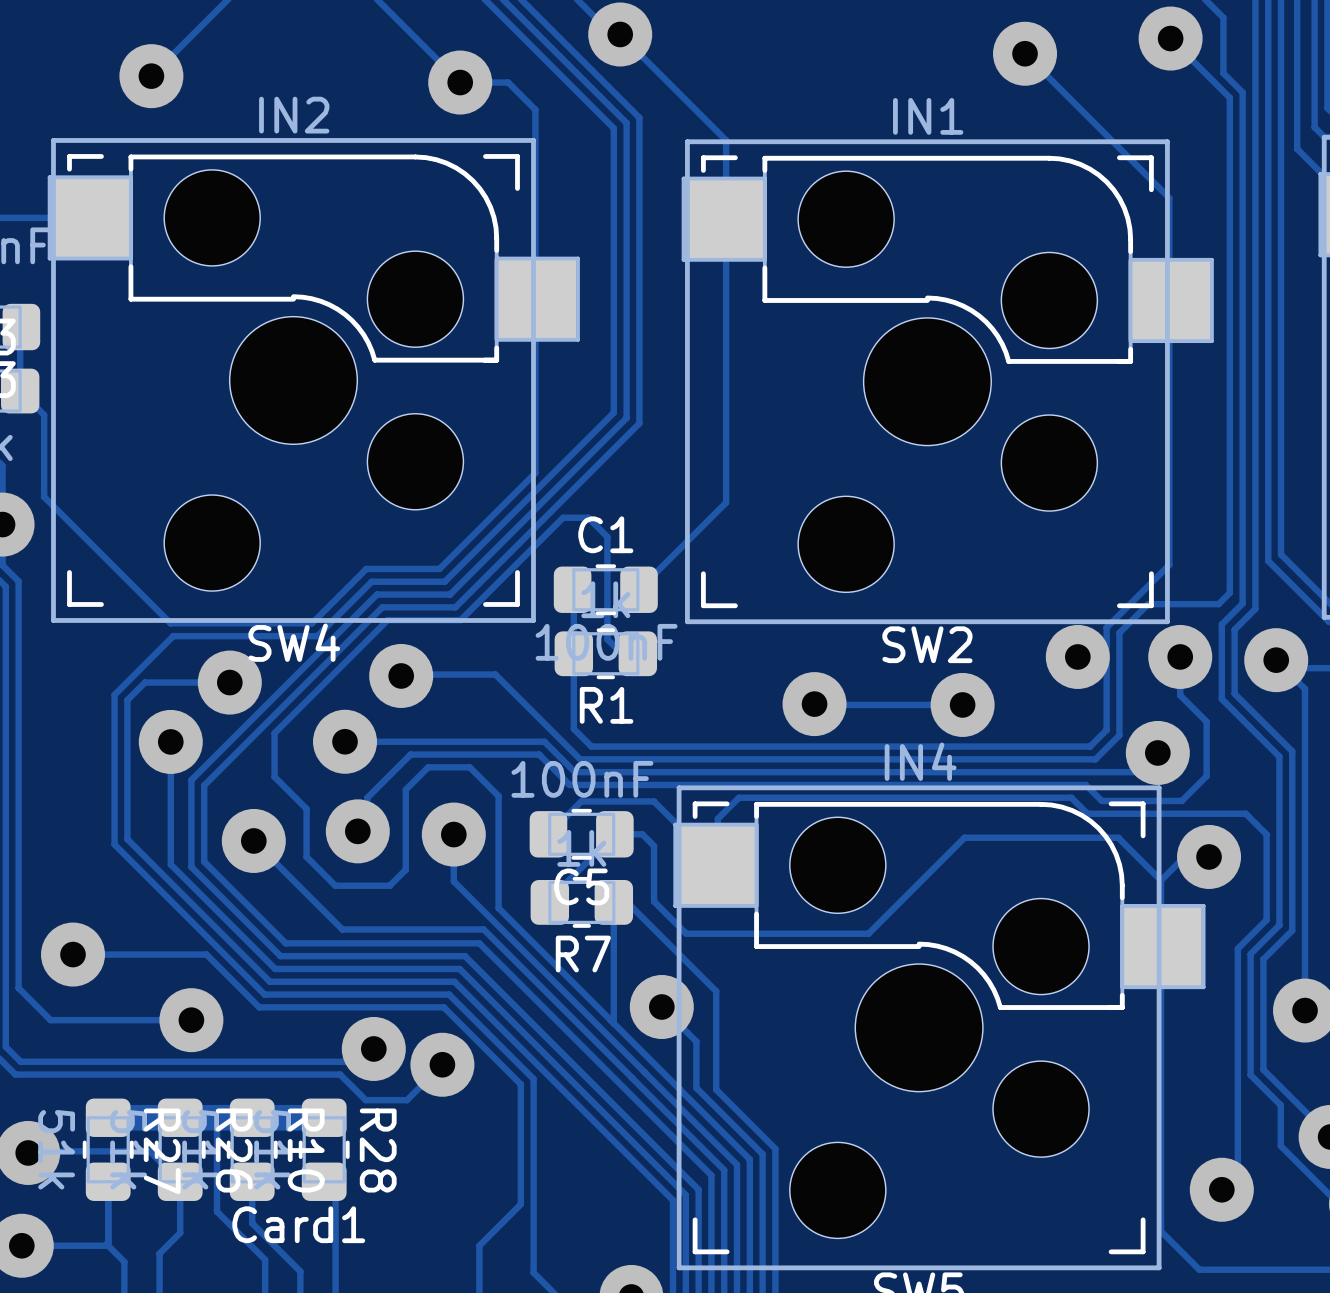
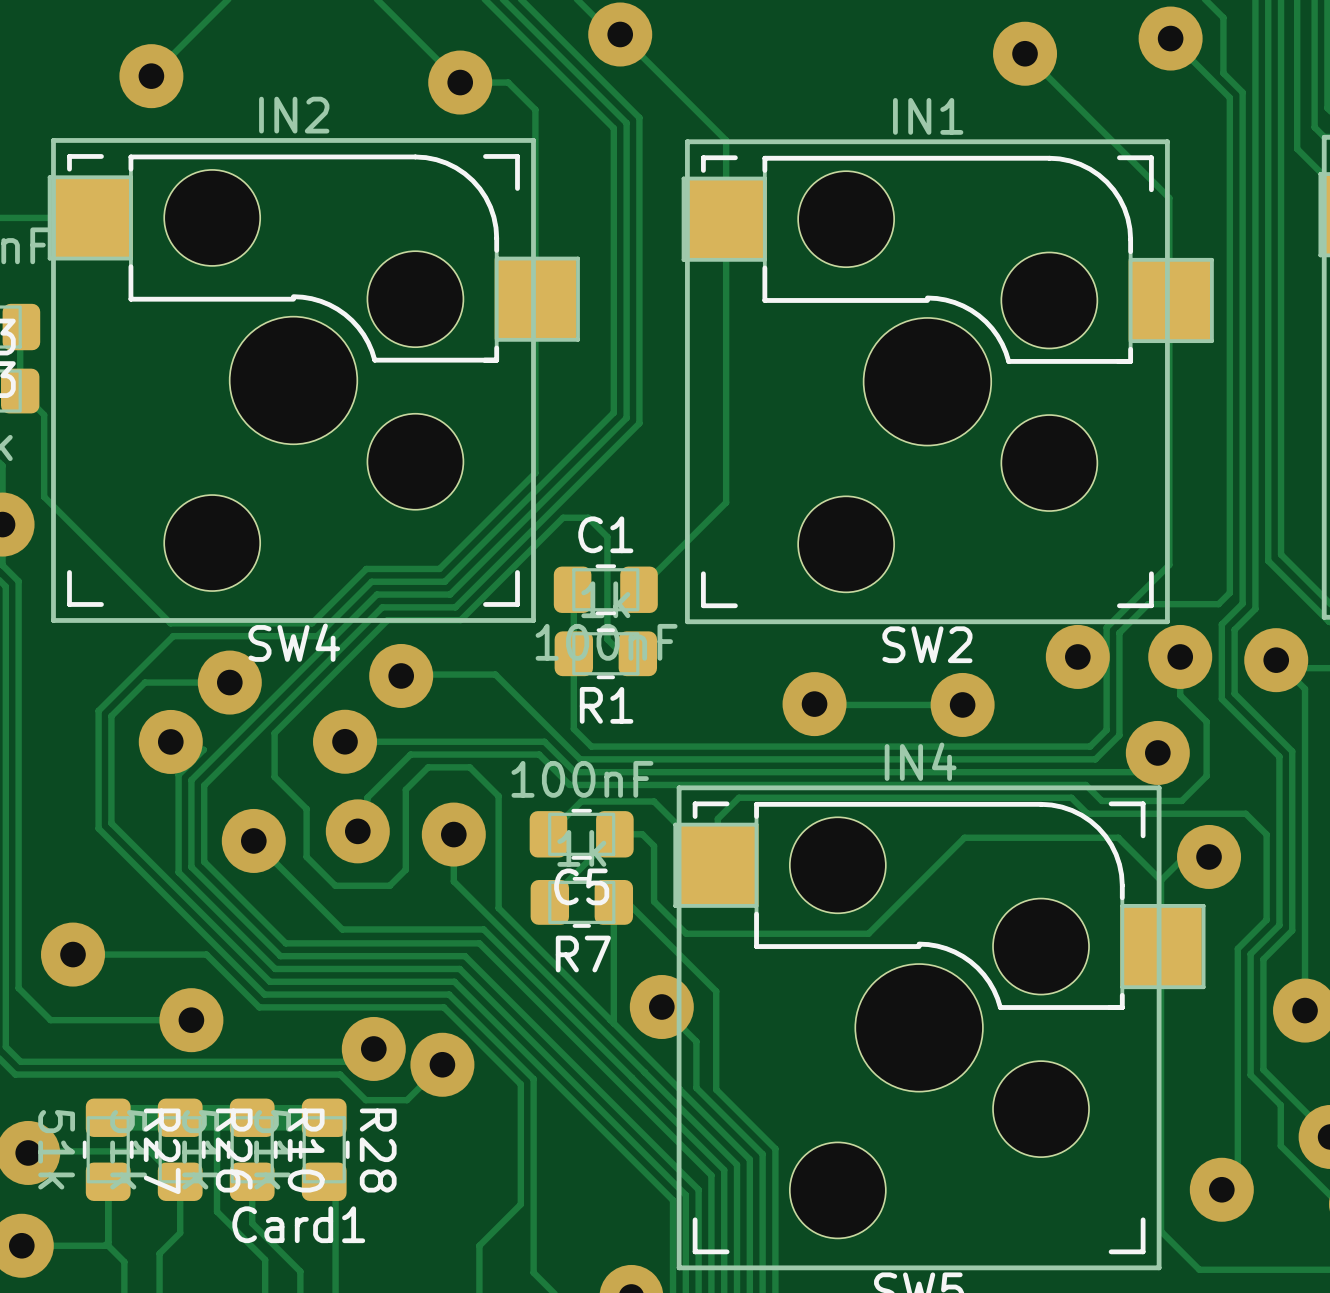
track: (114, 694) (114, 844) -> (114, 694) (98, 710) (98, 828) (114, 844)
track: (127, 700) (127, 839) -> (127, 700) (111, 716) (111, 823) (127, 839)
track: (170, 741) (170, 864) (178, 872) -> (170, 741) (178, 749) (203, 749) (178, 774) (178, 872)

